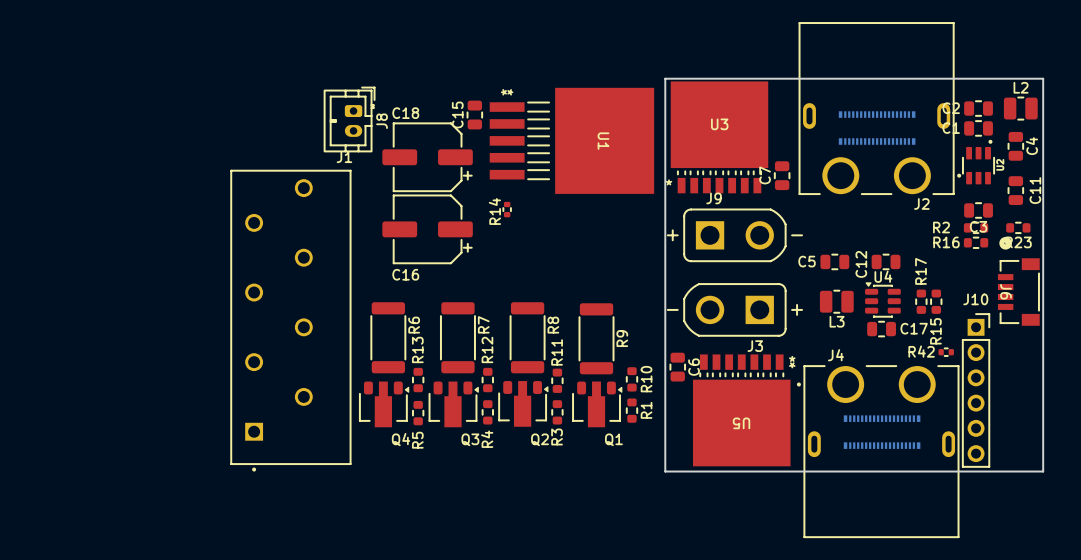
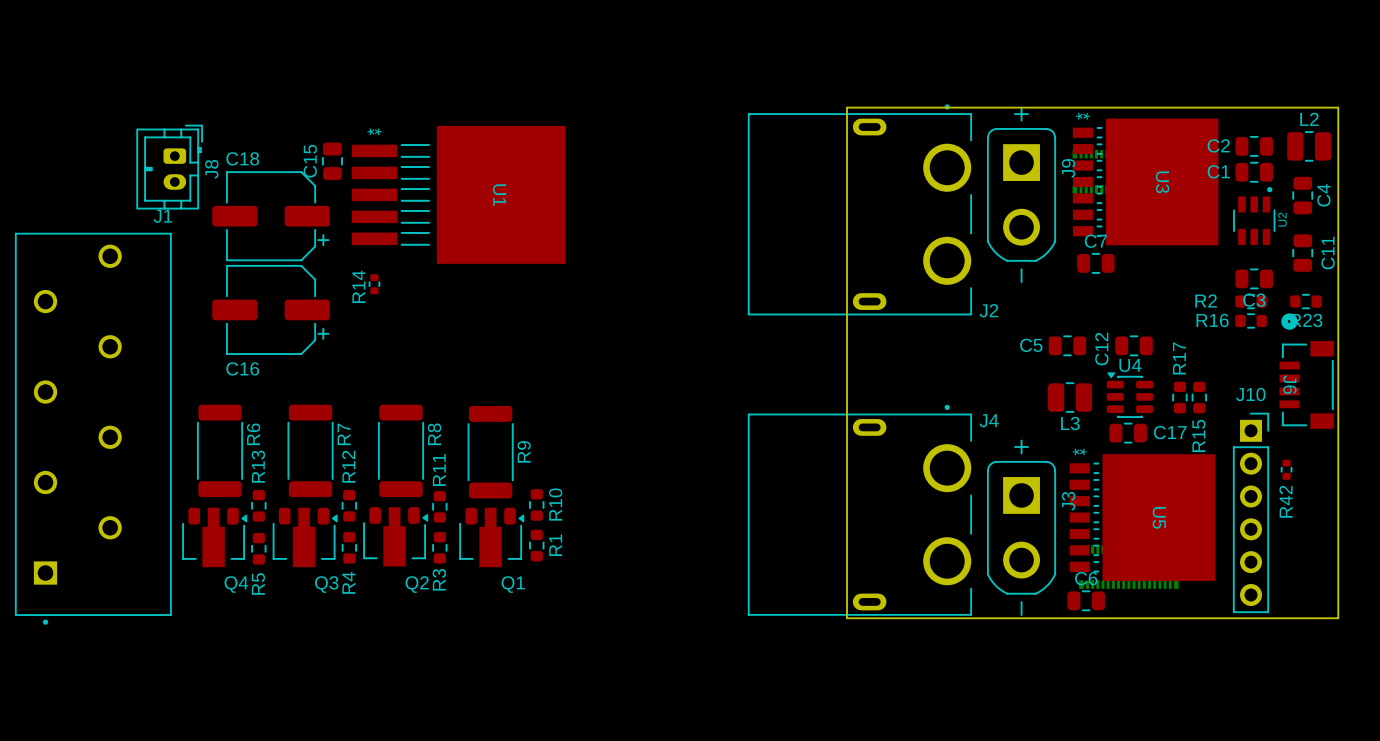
J2 rotation: 0° (880, 108) -> 90° counterclockwise (859, 209)
J2 position: (880, 108) -> (859, 209)
C15 position: (474, 115) -> (332, 161)
J8 position: (349, 119) -> (169, 167)
U3 rotation: 0° (719, 137) -> 90° clockwise (1145, 181)
U3 position: (719, 137) -> (1145, 181)
U1 position: (571, 140) -> (458, 194)
C18 position: (427, 157) -> (271, 216)
C7 rotation: 0° (782, 175) -> 90° clockwise (1095, 263)
C7 position: (782, 175) -> (1095, 263)
J2 name position: J2 (921, 203) -> J2 (988, 310)
R14 position: (507, 209) -> (374, 284)
C16 position: (427, 229) -> (271, 309)
J9 rotation: 0° (734, 235) -> 90° clockwise (1021, 194)
J9 position: (734, 235) -> (1021, 194)
J3 rotation: 0° (734, 309) -> 90° counterclockwise (1021, 527)
J3 position: (734, 309) -> (1021, 527)
J1 position: (290, 320) -> (93, 428)
R6 position: (388, 337) -> (220, 450)
R7 position: (457, 337) -> (310, 450)
R8 position: (527, 337) -> (401, 450)
R9 position: (596, 338) -> (490, 452)
R42 name position: R42 (921, 351) -> R42 (1285, 501)
R42 rotation: 0° (946, 352) -> 90° clockwise (1286, 469)
R42 position: (946, 352) -> (1286, 469)
J4 name position: J4 (835, 355) -> J4 (989, 420)
C6 rotation: 0° (677, 367) -> 90° clockwise (1086, 600)
C6 position: (677, 367) -> (1086, 600)
C6 name position: C6 (694, 367) -> C6 (1086, 578)
R10 position: (631, 379) -> (536, 504)
R13 position: (418, 380) -> (258, 505)
R12 position: (487, 380) -> (349, 505)
R11 position: (557, 380) -> (439, 506)
Q2 position: (523, 403) -> (395, 536)
Q4 position: (384, 404) -> (214, 537)
Q3 position: (453, 404) -> (305, 537)
Q1 position: (597, 404) -> (491, 537)
R1 position: (631, 410) -> (536, 545)
U5 rotation: 0° (741, 410) -> 90° counterclockwise (1142, 517)
U5 position: (741, 410) -> (1142, 517)
R4 position: (487, 412) -> (349, 547)
R3 position: (557, 412) -> (439, 547)
R5 position: (418, 413) -> (258, 548)
J4 rotation: 0° (878, 451) -> 90° clockwise (859, 510)
J4 position: (878, 451) -> (859, 510)

